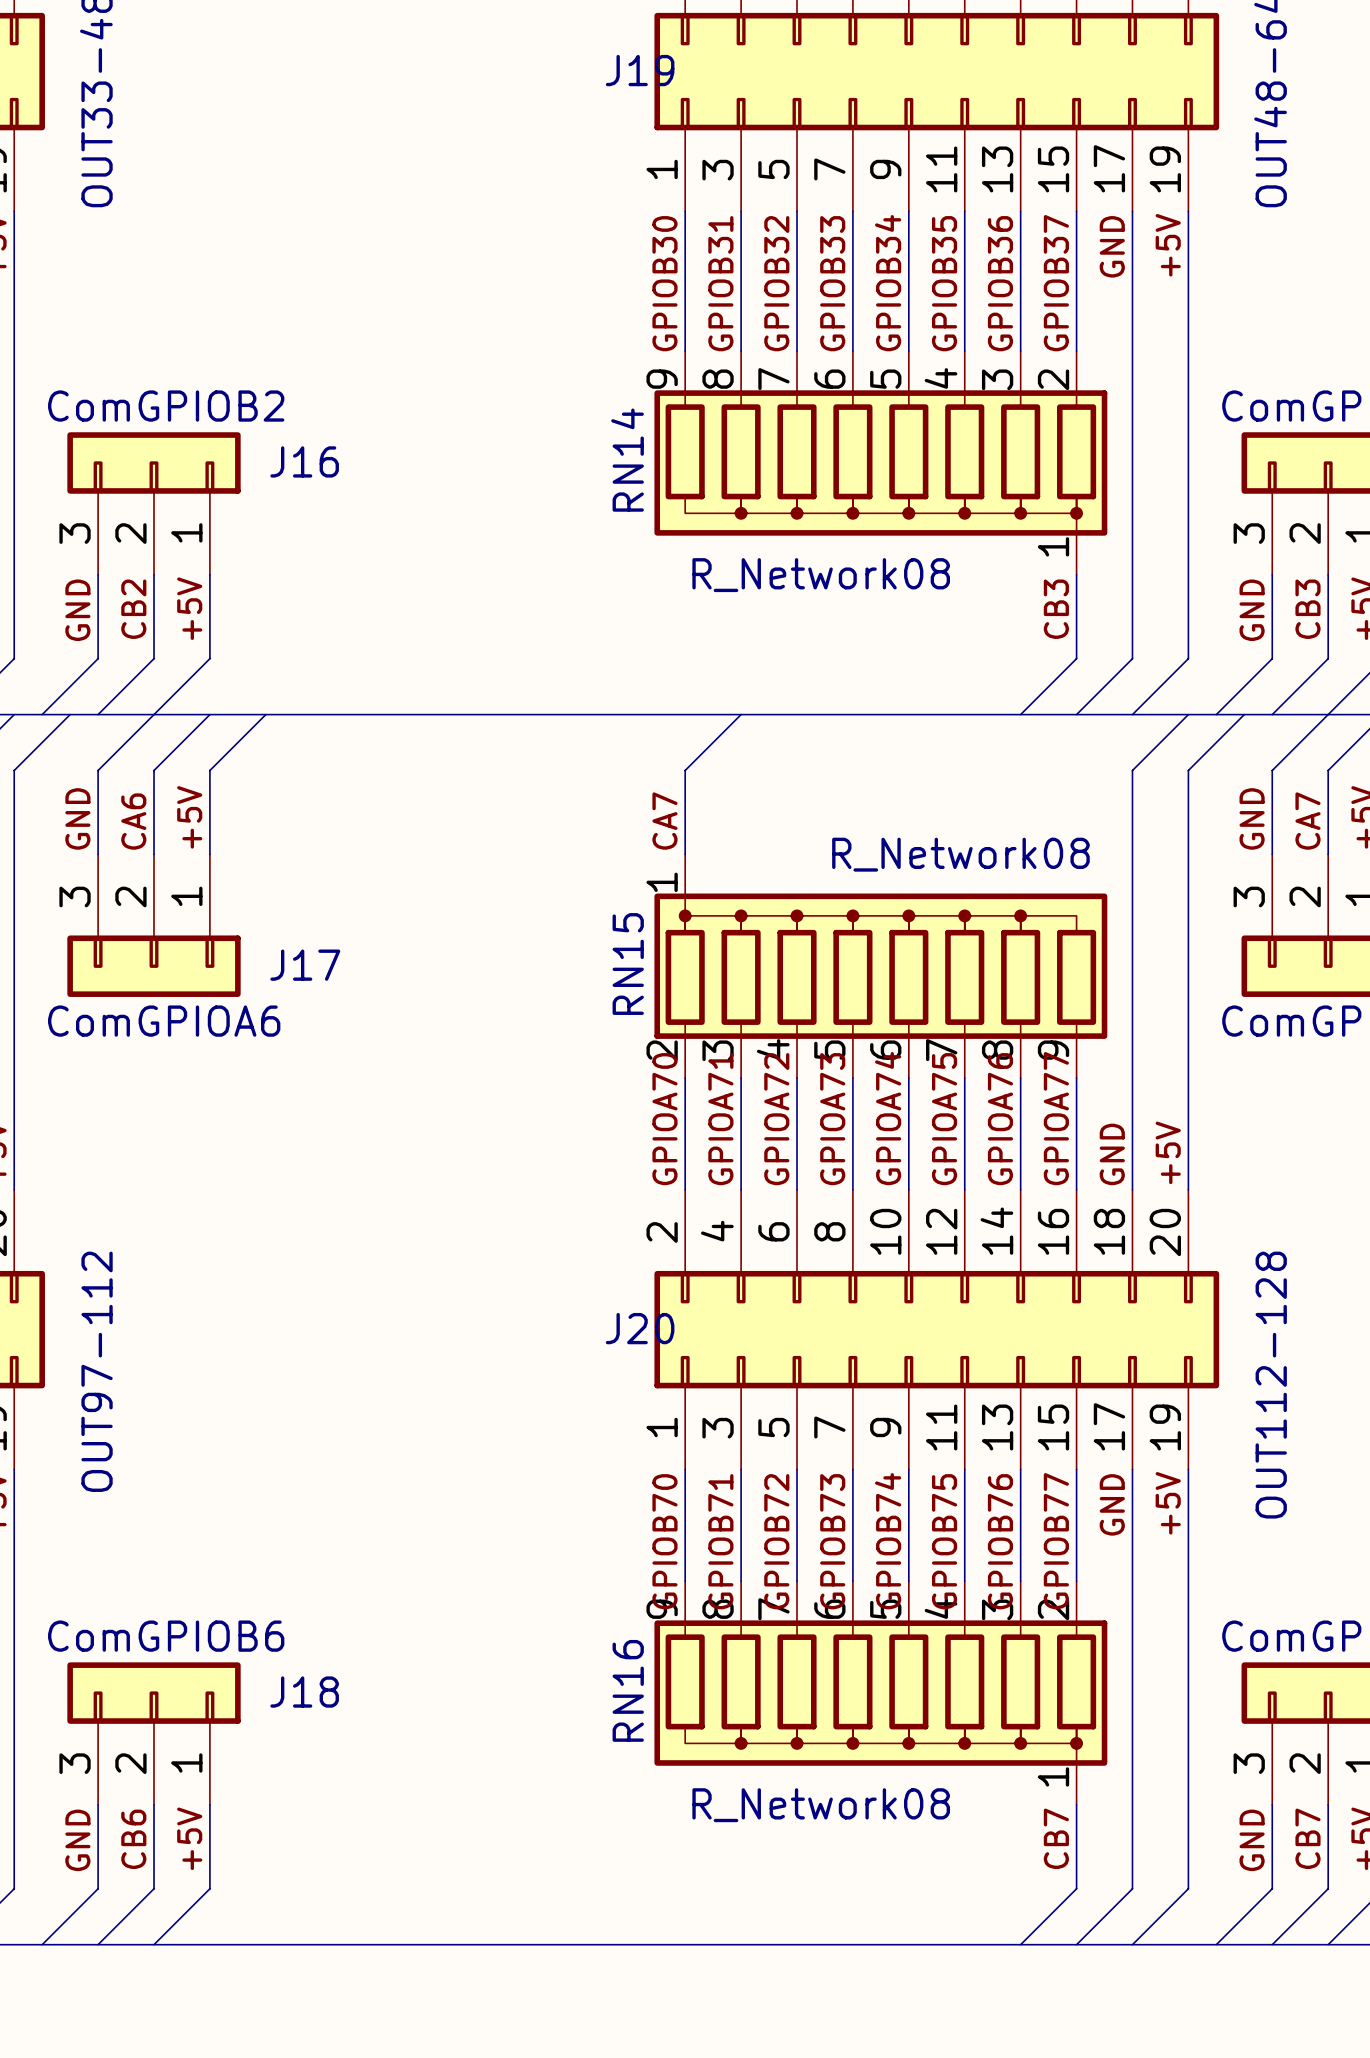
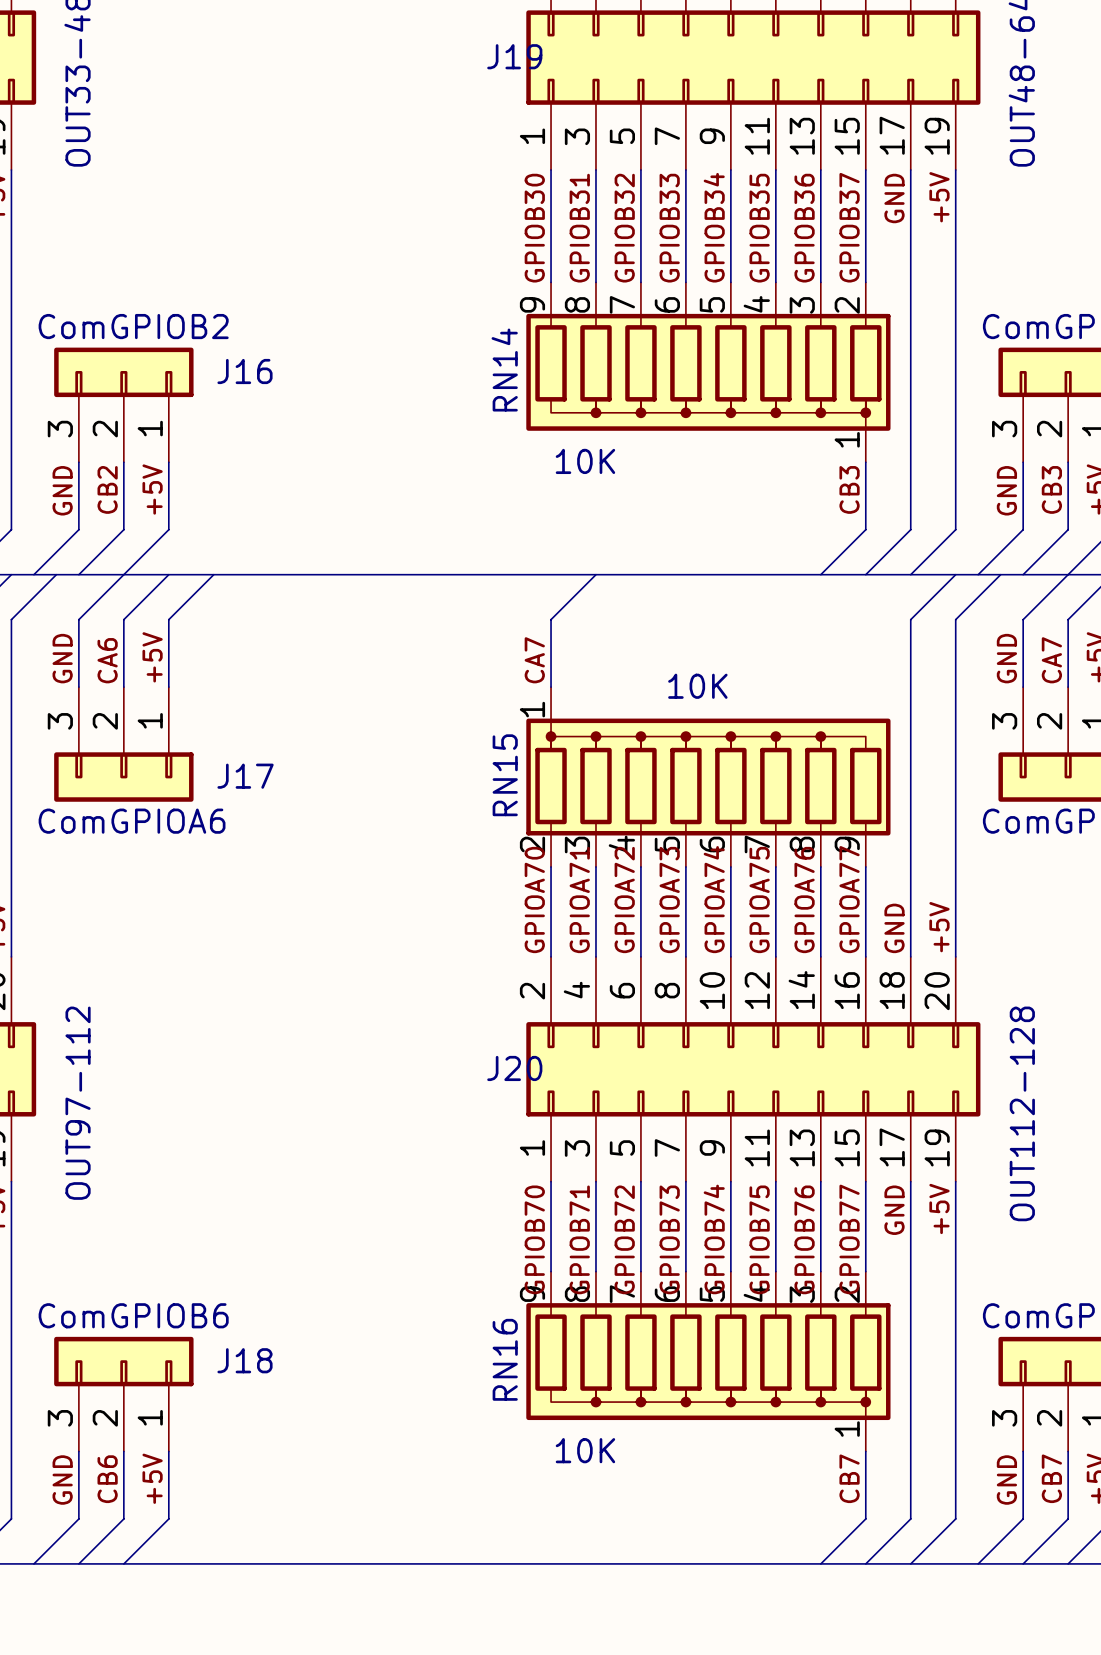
RN14 value: R_Network08 (821, 575) -> 10K (585, 461)
RN15 value: R_Network08 (960, 854) -> 10K (697, 686)
RN16 value: R_Network08 (821, 1805) -> 10K (585, 1450)

